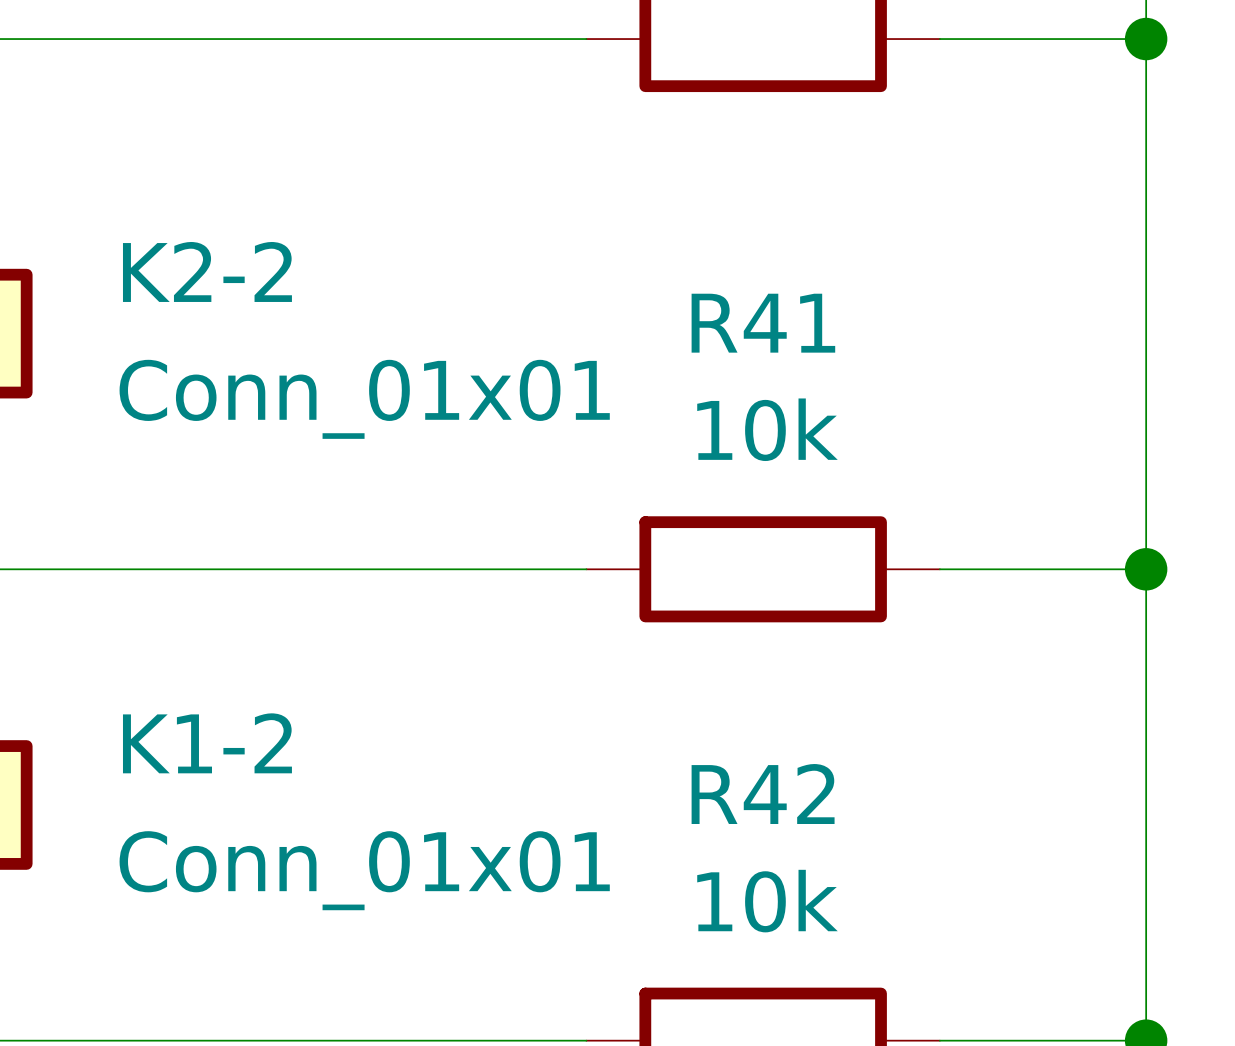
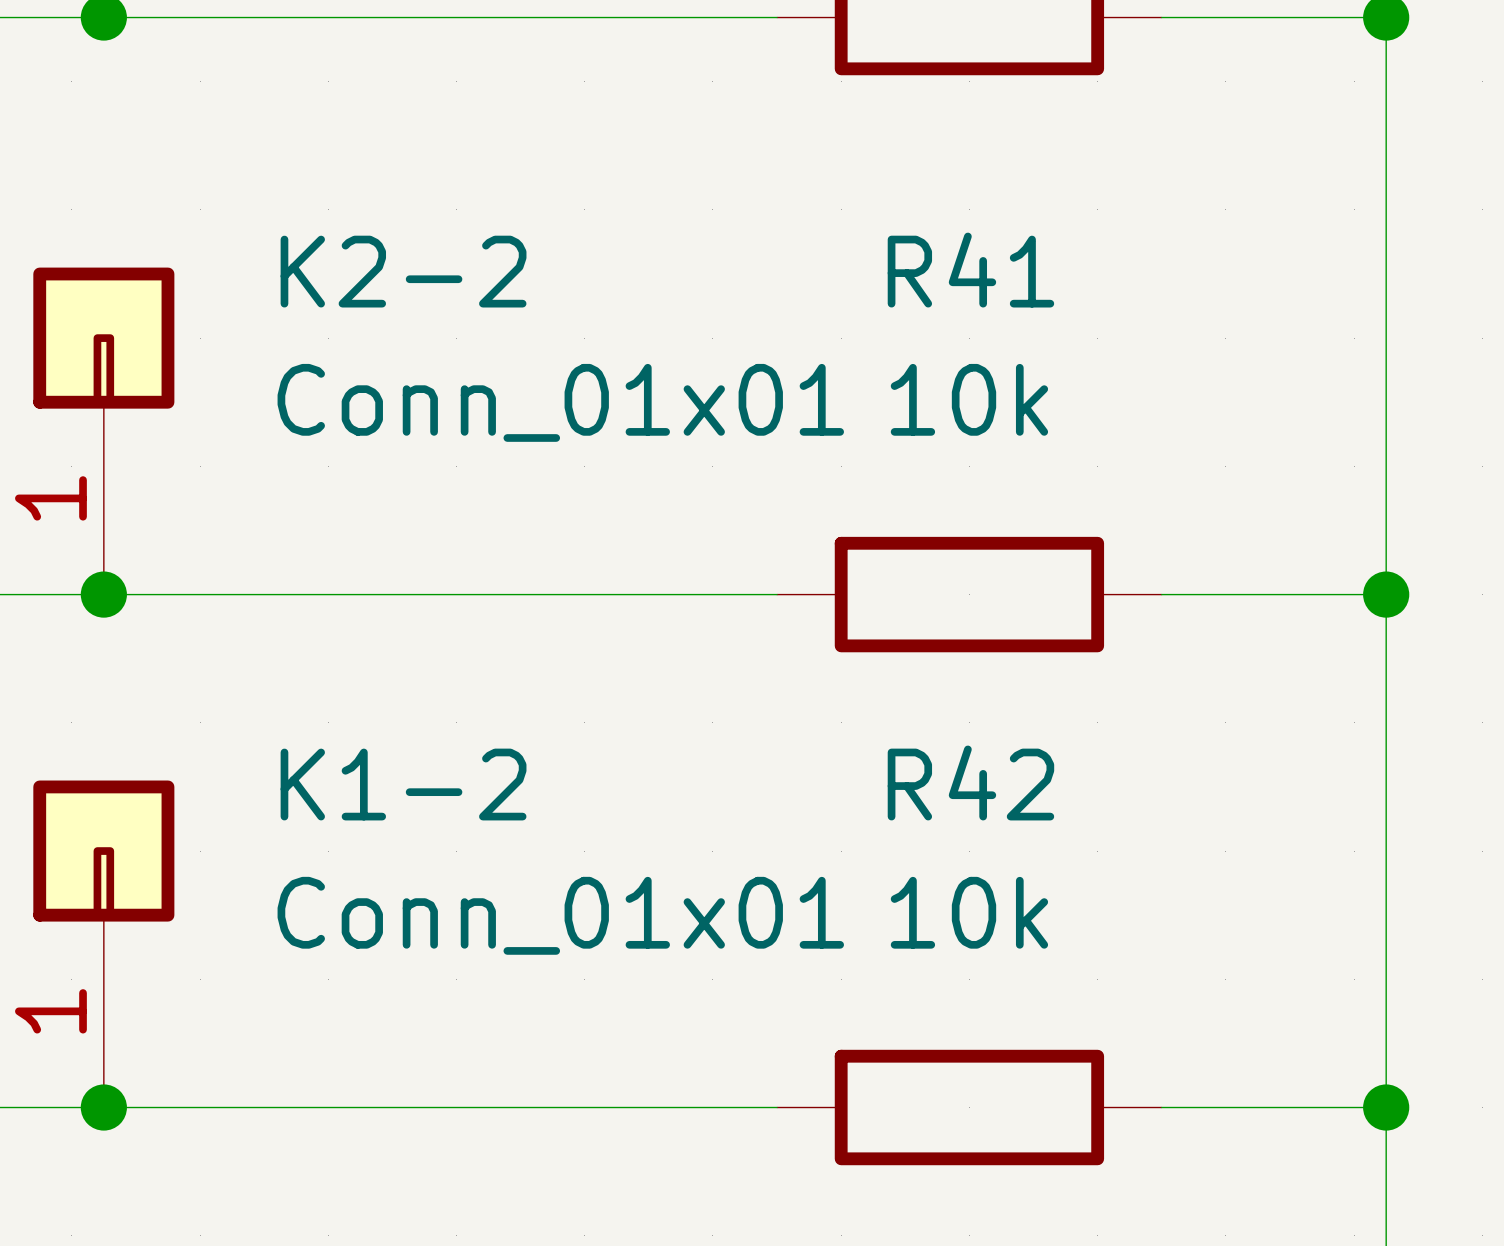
R41 name position: R41 (763, 323) -> R41 (970, 270)
R41 value position: 10k (767, 429) -> 10k (969, 399)
R42 name position: R42 (763, 794) -> R42 (970, 783)
R42 value position: 10k (767, 901) -> 10k (969, 912)

